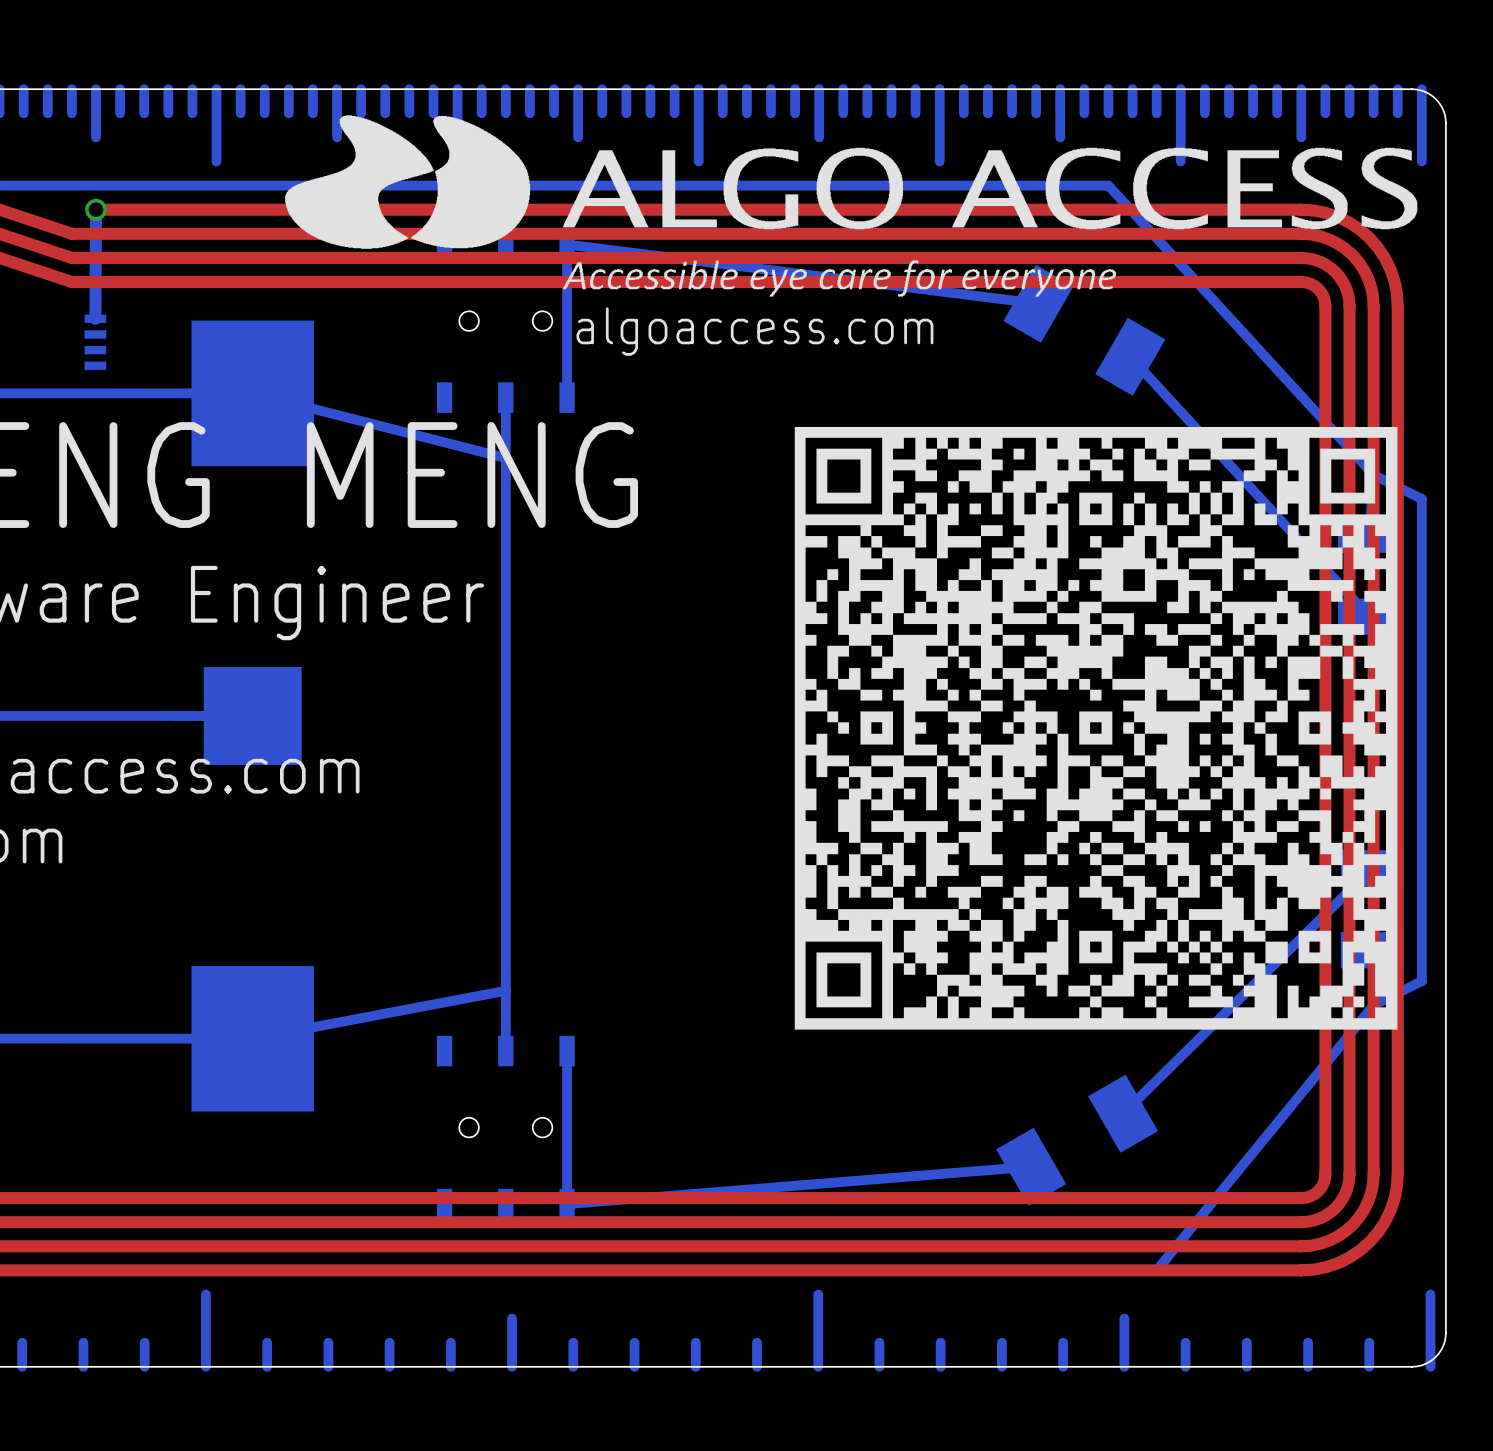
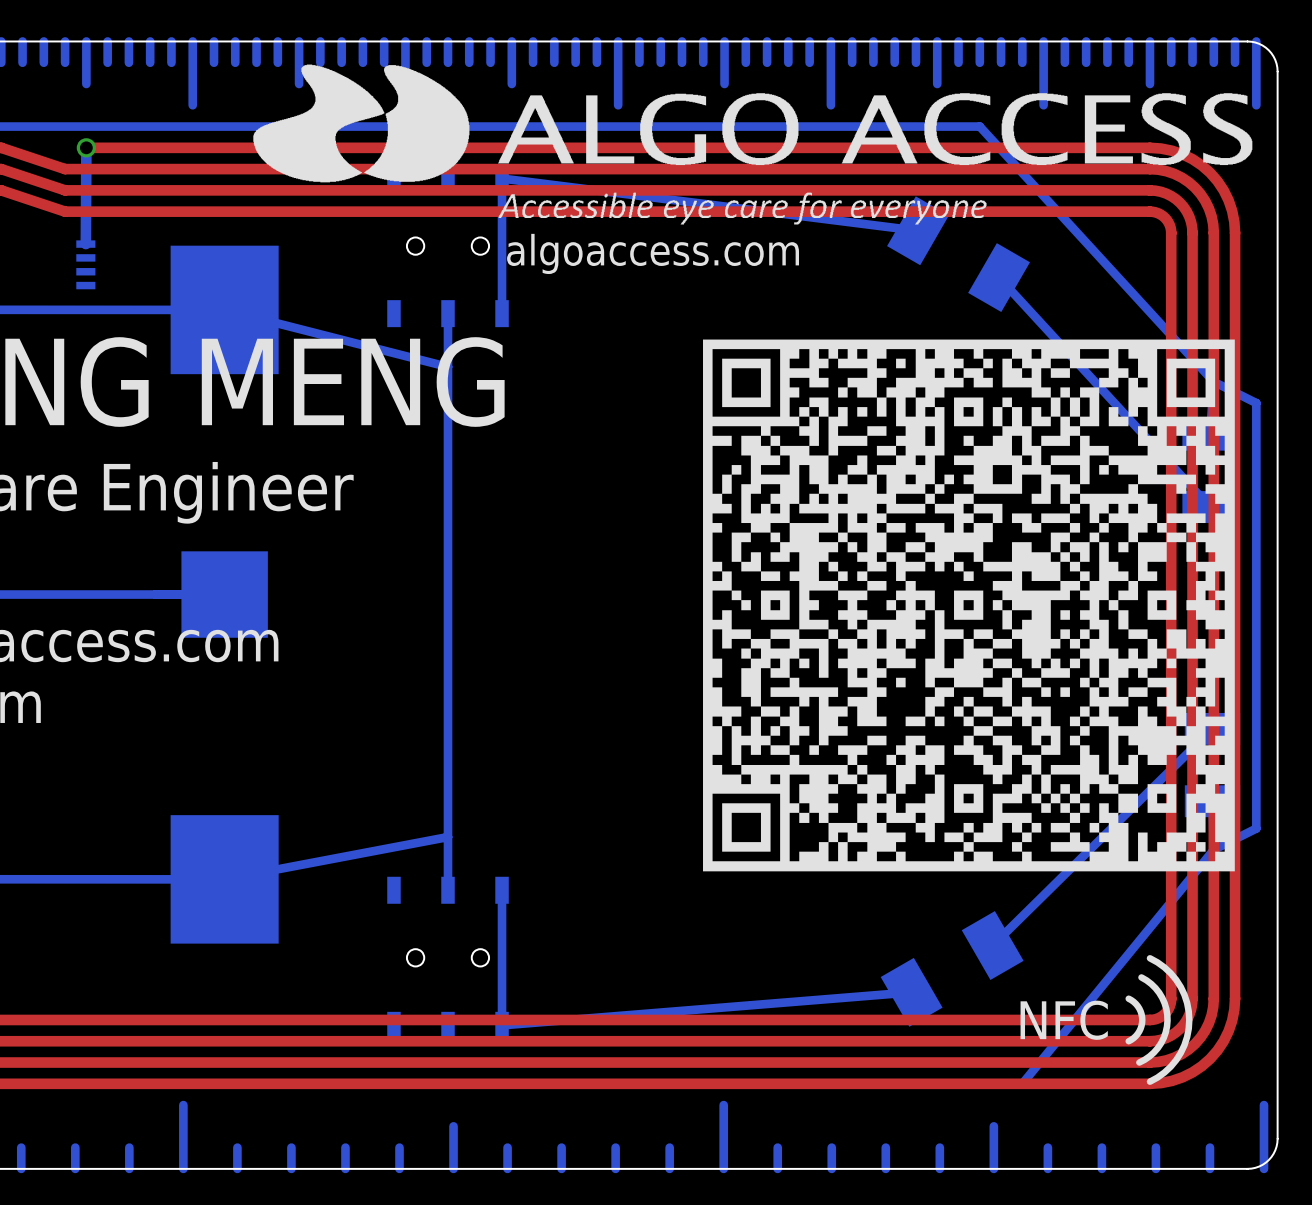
line: none -> (1149, 958) (1170, 973) (1180, 987) (1187, 1003) (1189, 1019) (1187, 1036) (1180, 1052) (1170, 1066) (1149, 1081)
line: none -> (1141, 977) (1159, 992) (1164, 1003) (1167, 1020) (1163, 1037) (1157, 1048) (1139, 1062)
line: none -> (1128, 998) (1139, 1008) (1142, 1019) (1139, 1031) (1128, 1041)
text: none -> NFC (1064, 1020)

